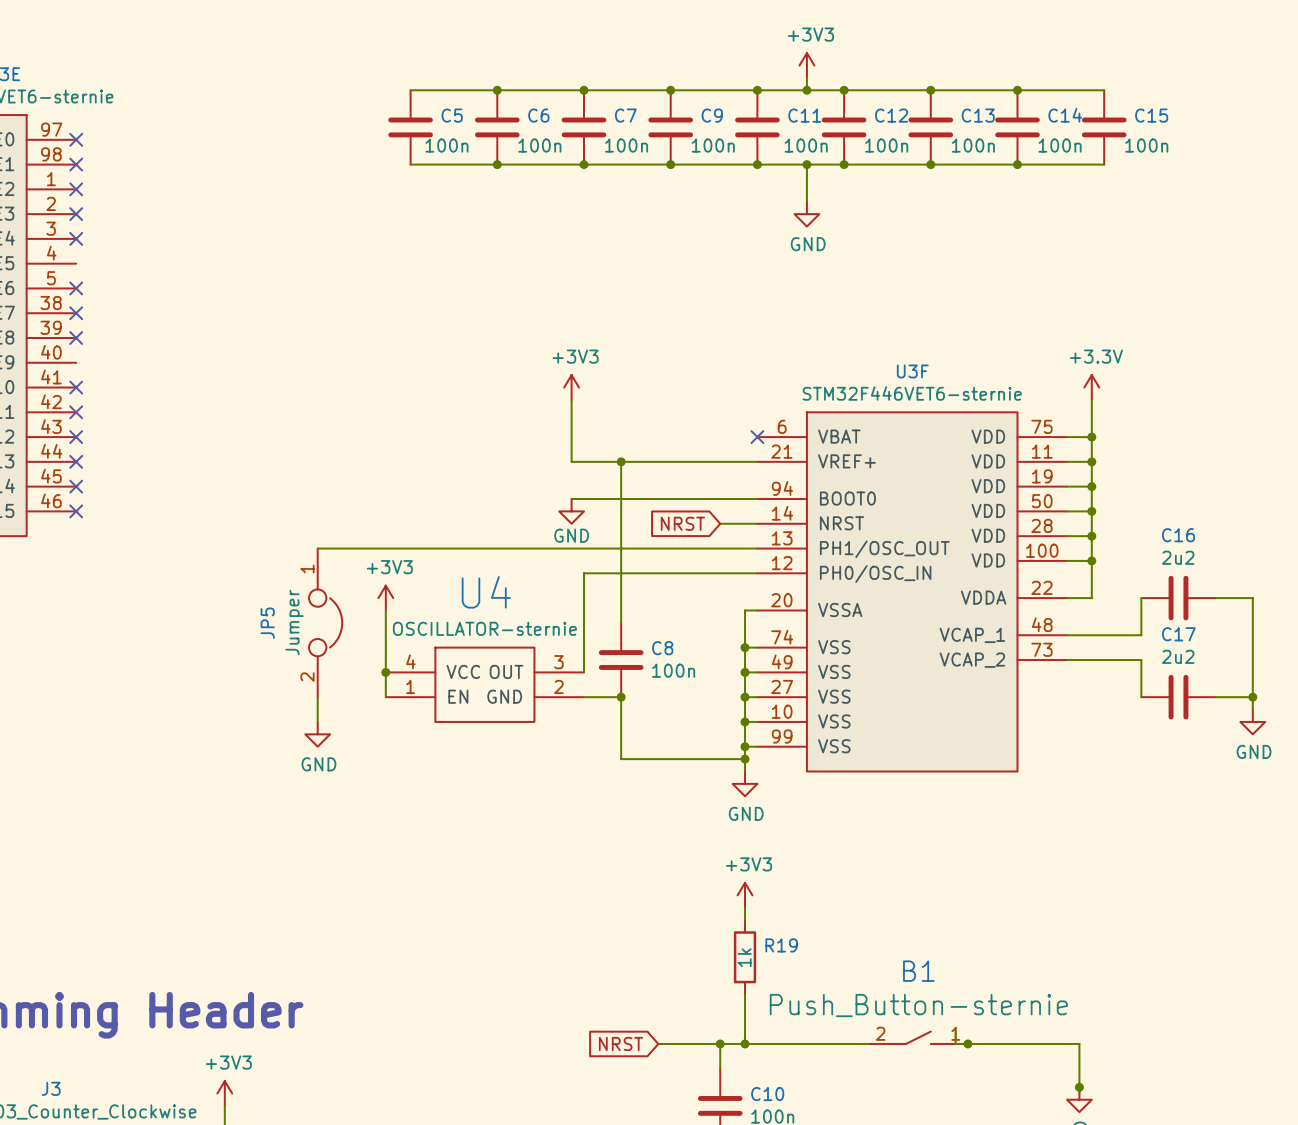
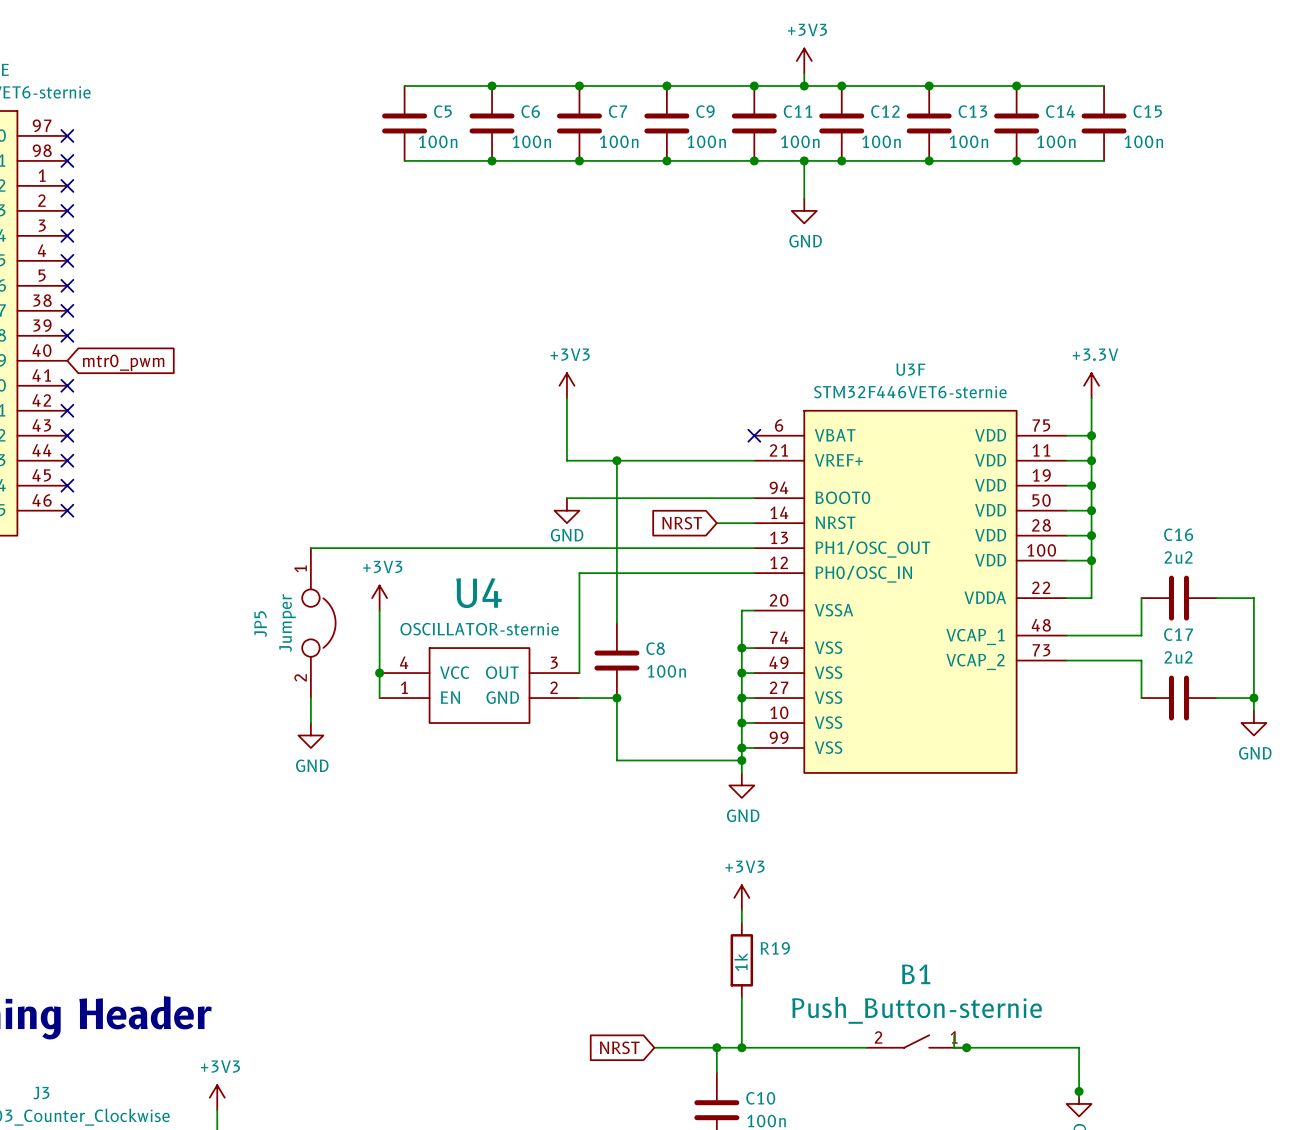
no-connect mark: none -> (67, 260)
global label: none -> mtr0_pwm (123, 362)

